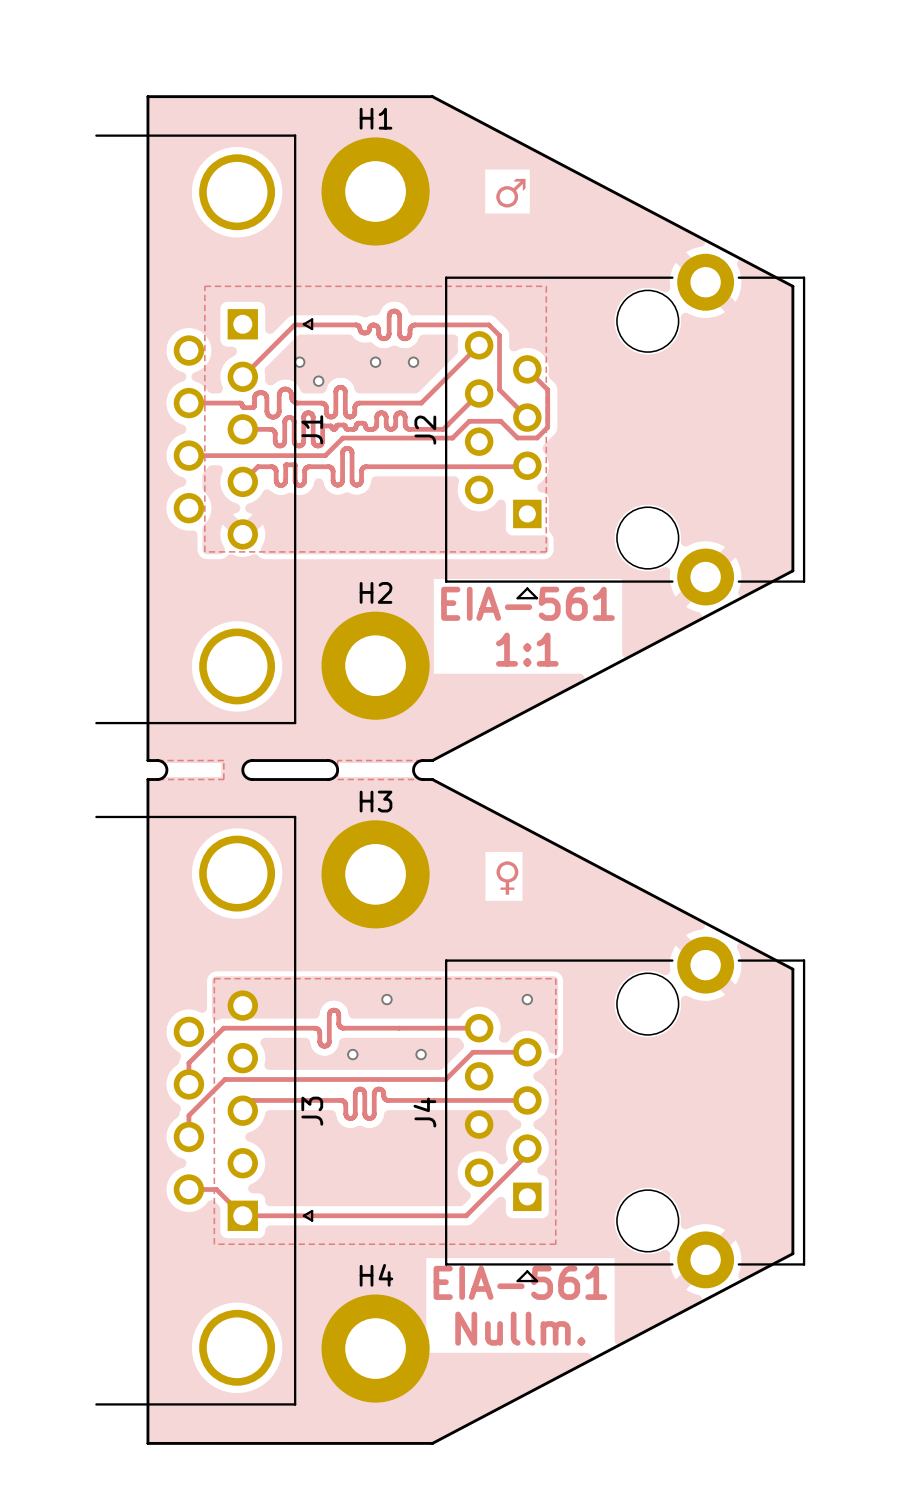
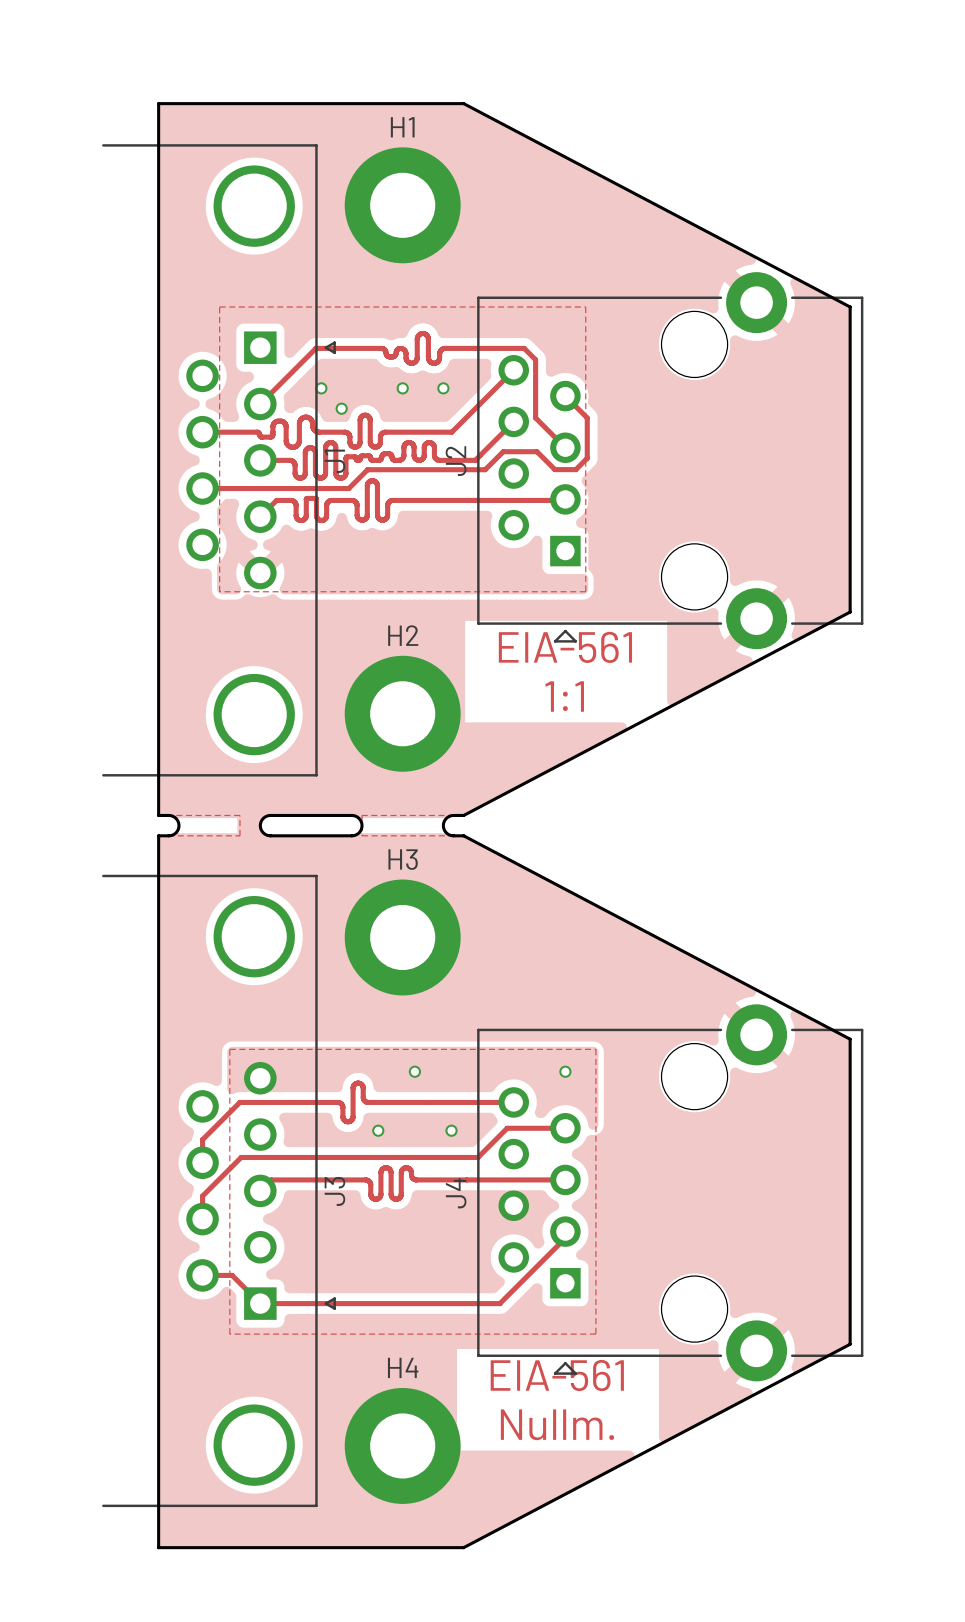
text: ♂ (510, 193) -> none
text: ♀ (507, 878) -> none

